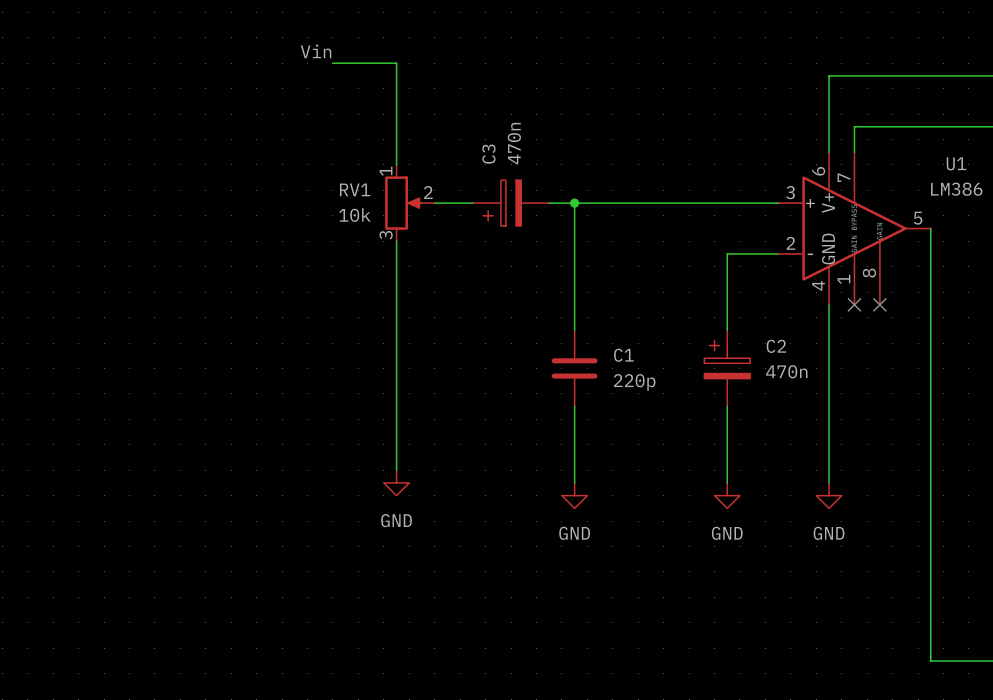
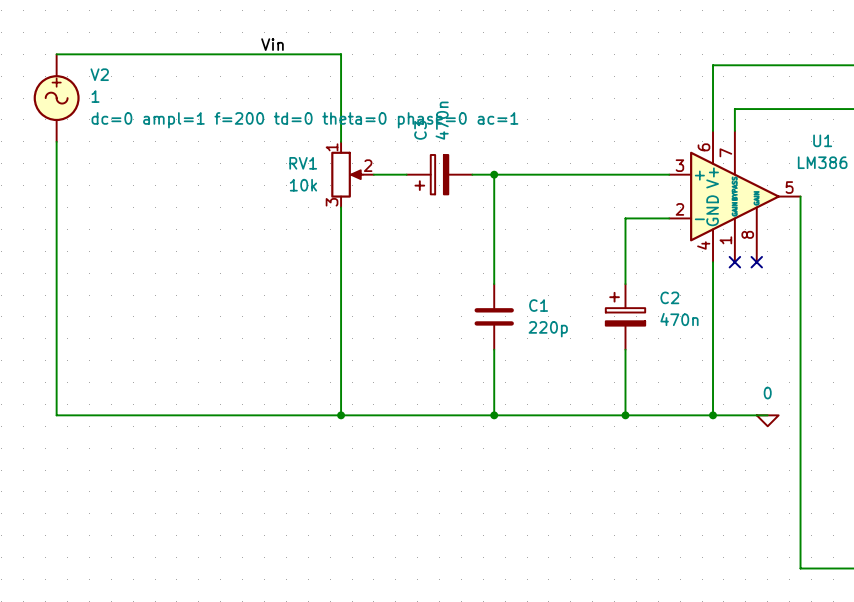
wire: none -> (56, 54) (286, 54)
V2: none -> 1 (56, 98)
wire: none -> (56, 141) (56, 415) (767, 415)
power symbol: GND (396, 482) -> none
junction: none -> (341, 415)
junction: none -> (494, 415)
junction: none -> (625, 415)
junction: none -> (713, 415)
power symbol: none -> 0 (767, 420)
power symbol: GND (574, 495) -> none
power symbol: GND (727, 495) -> none
power symbol: GND (829, 495) -> none

